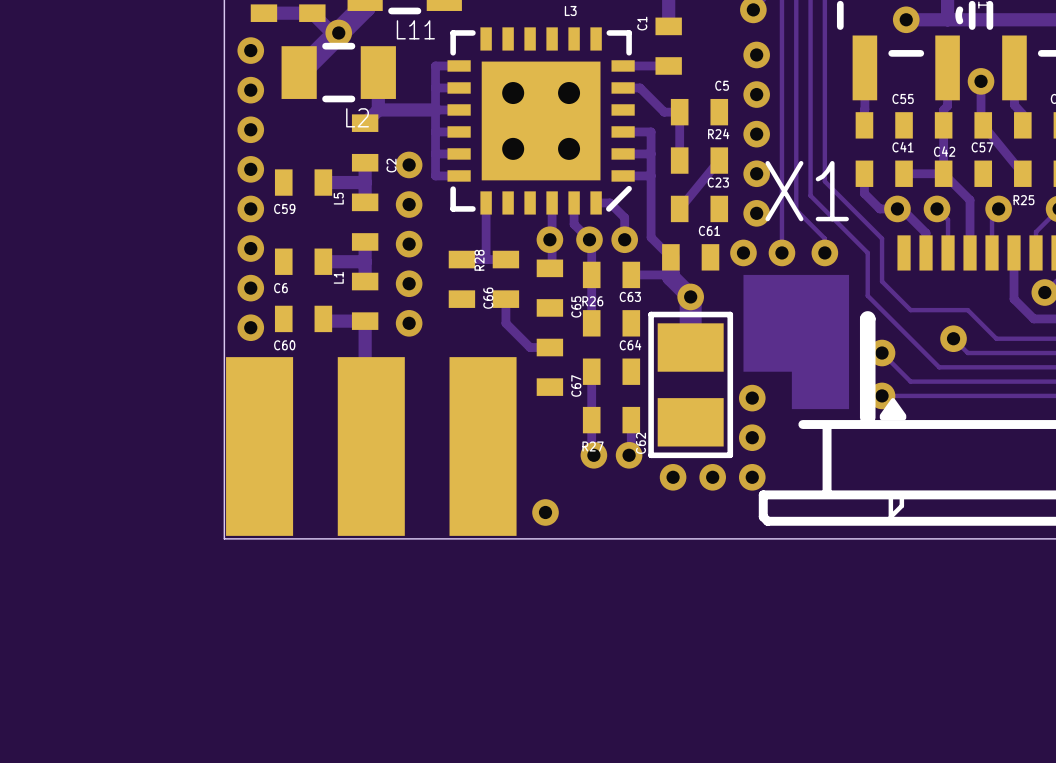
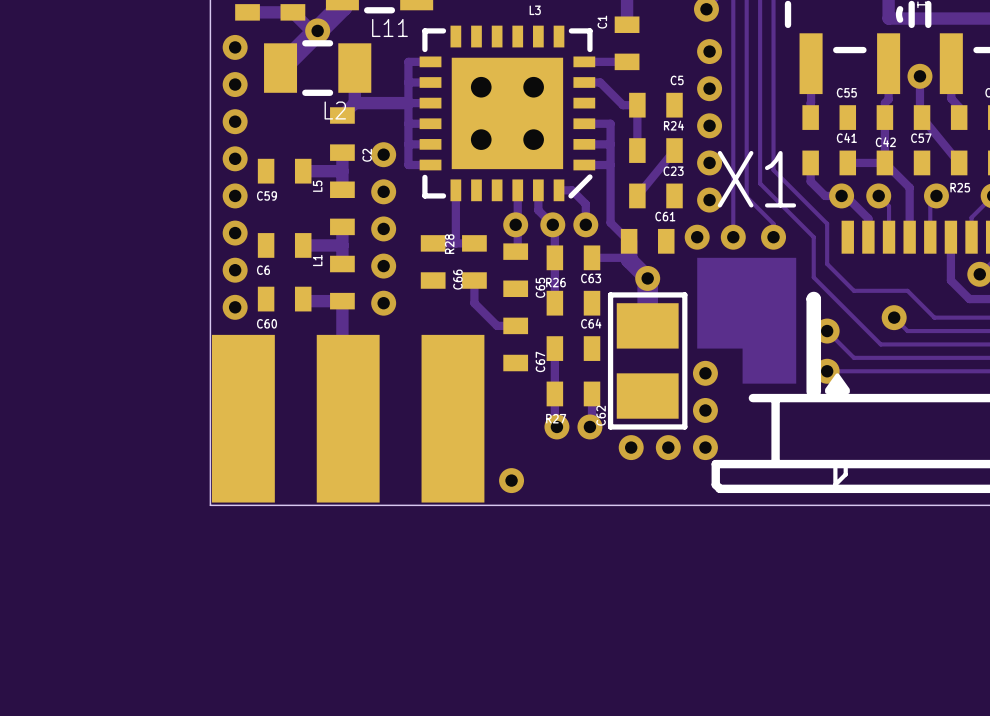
track: (906, 19) (947, 19) -> none
via: (906, 19) -> none

